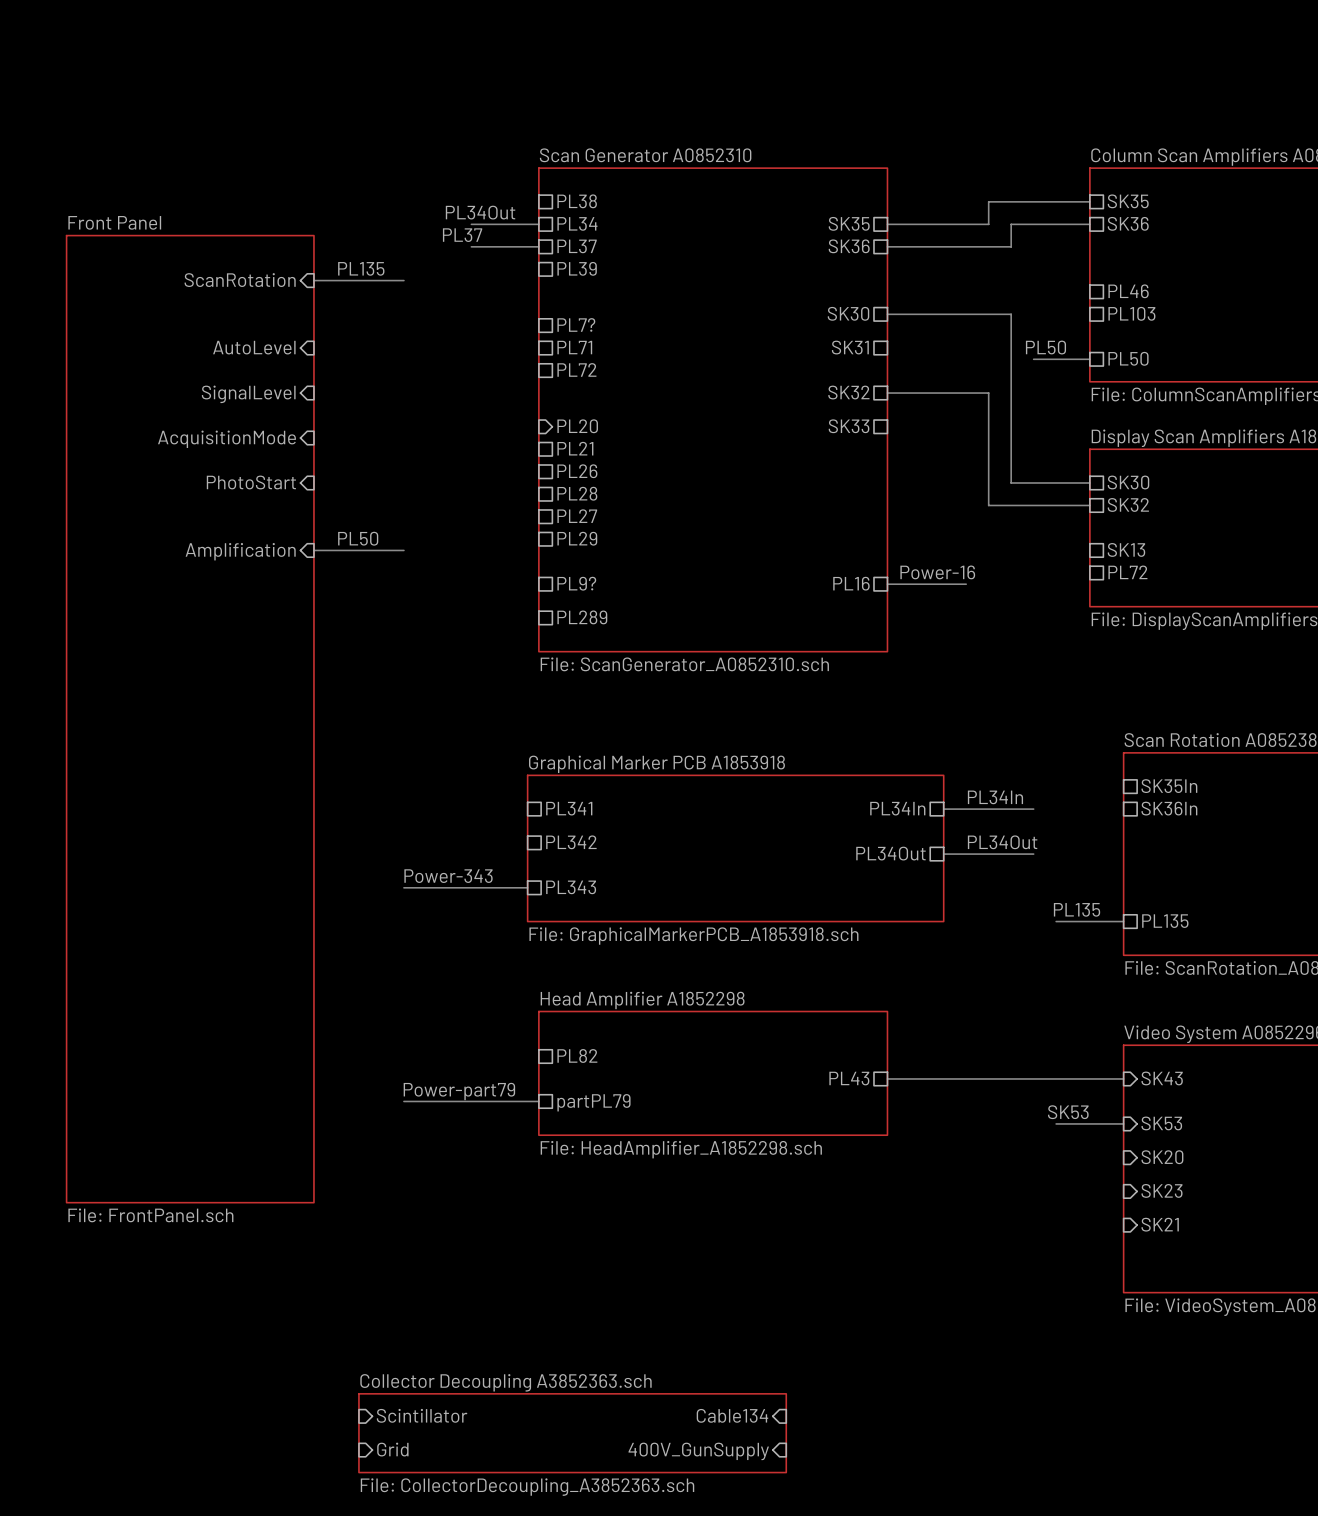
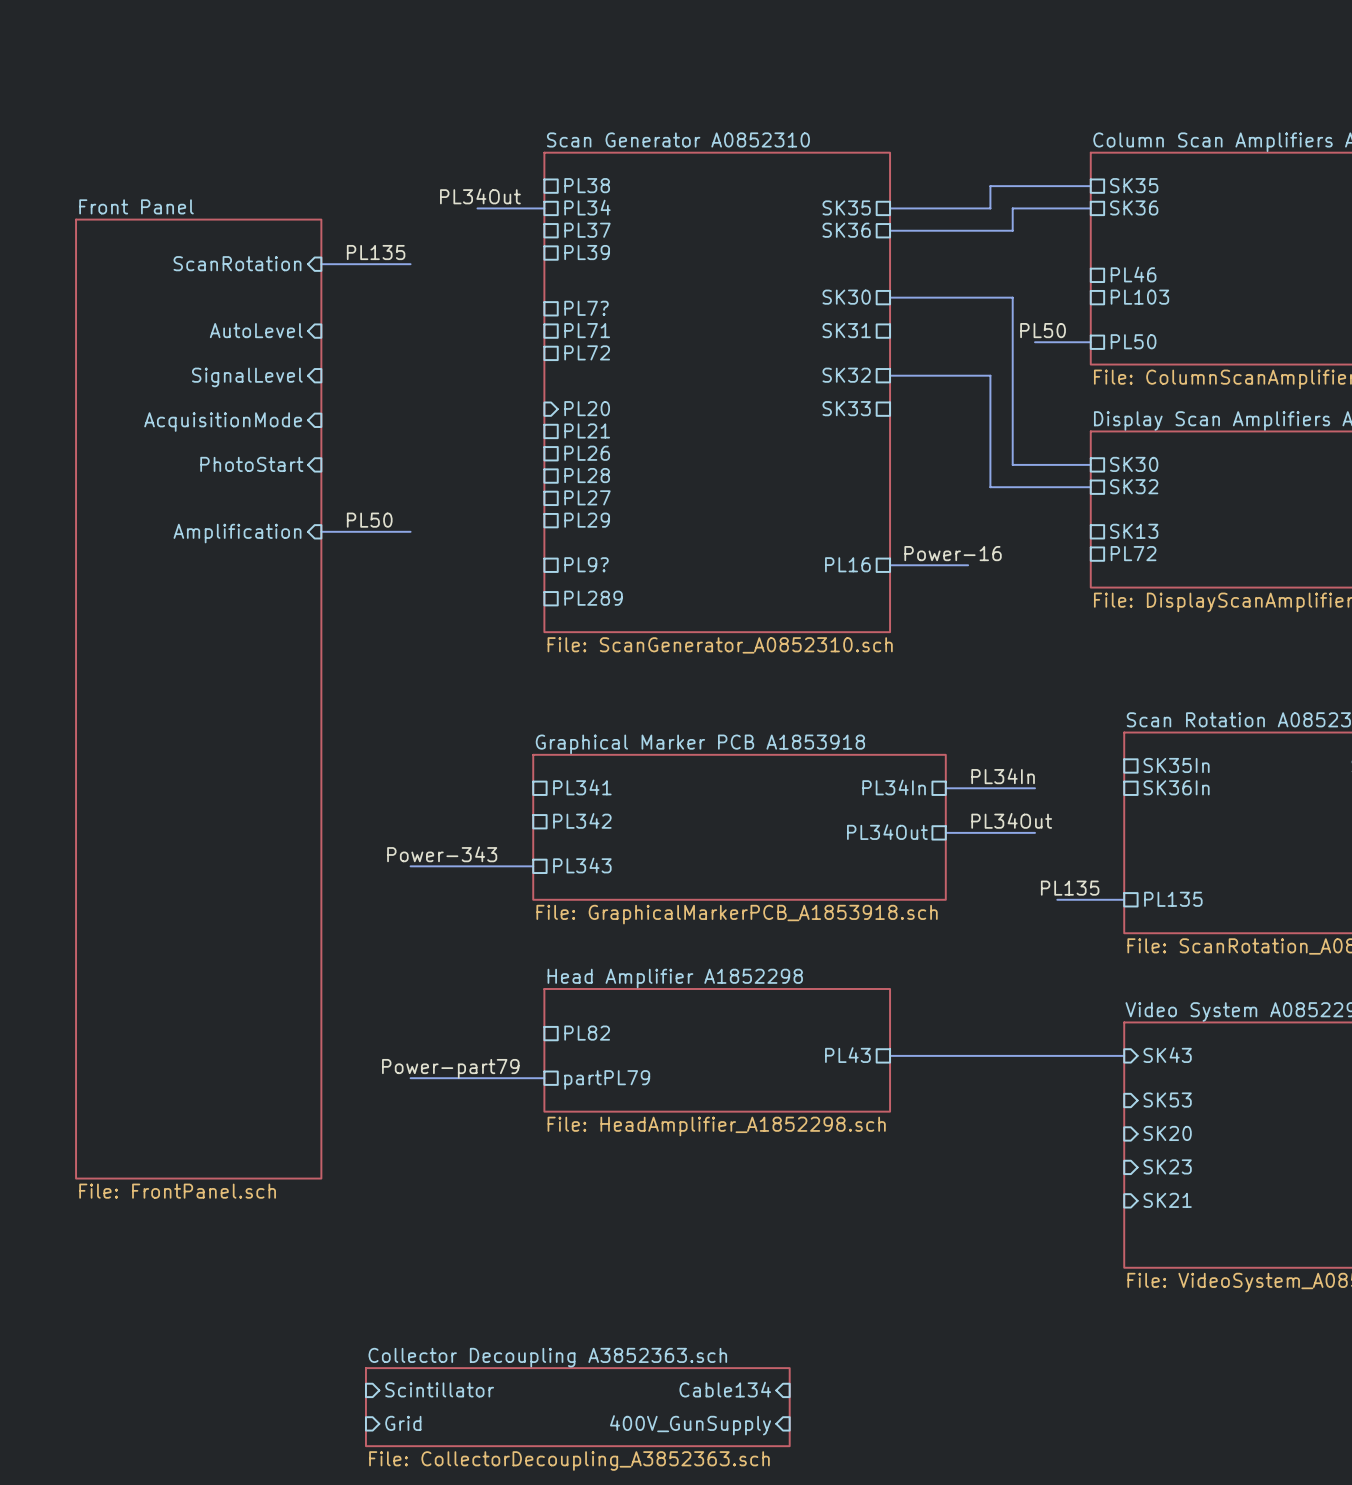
label: PL37 (462, 235) -> none
bus: (471, 246) (538, 246) -> none
label: SK53 (1068, 1112) -> none
bus: (1056, 1123) (1123, 1123) -> none

